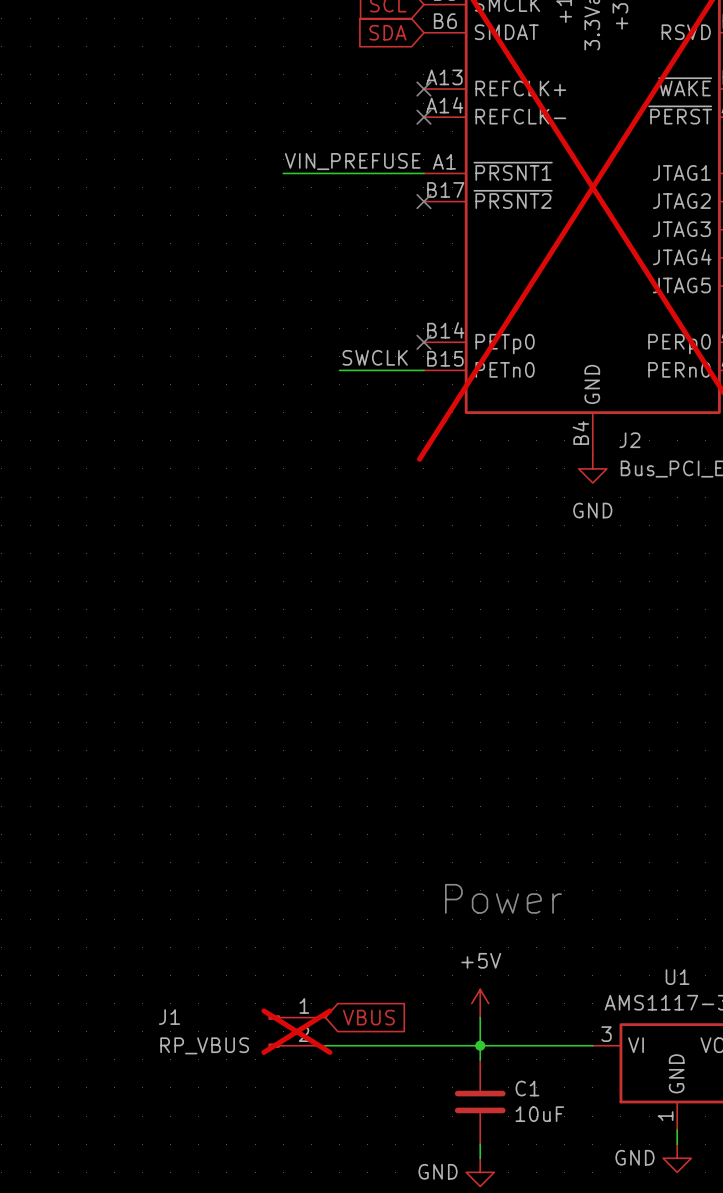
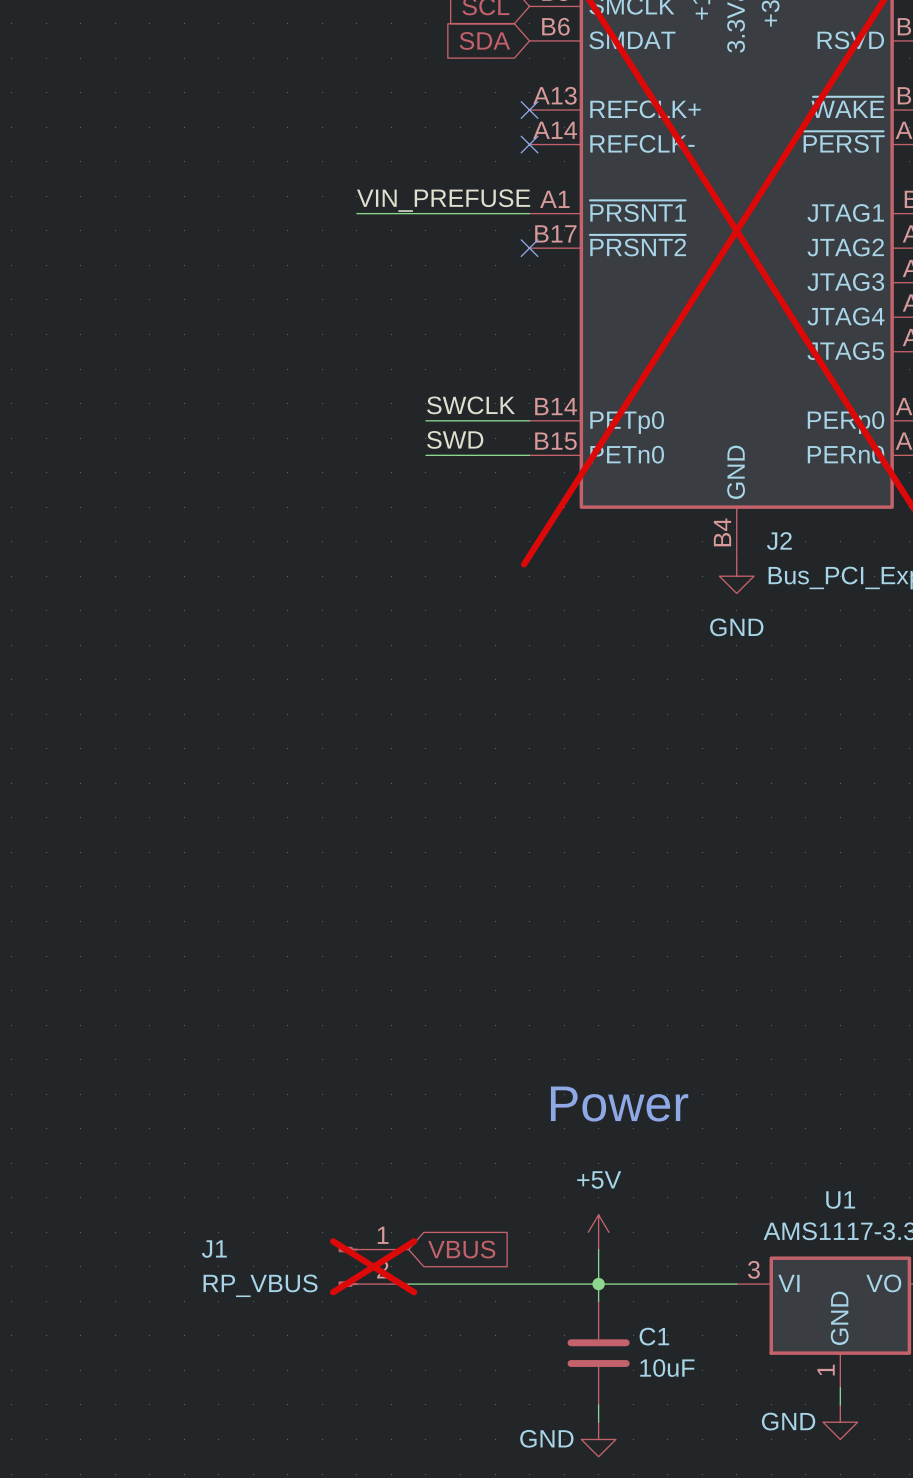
label: none -> SWCLK (471, 405)
wire: none -> (425, 420) (529, 420)
no-connect mark: (423, 342) -> none
label: SWCLK (375, 357) -> SWD (455, 439)

